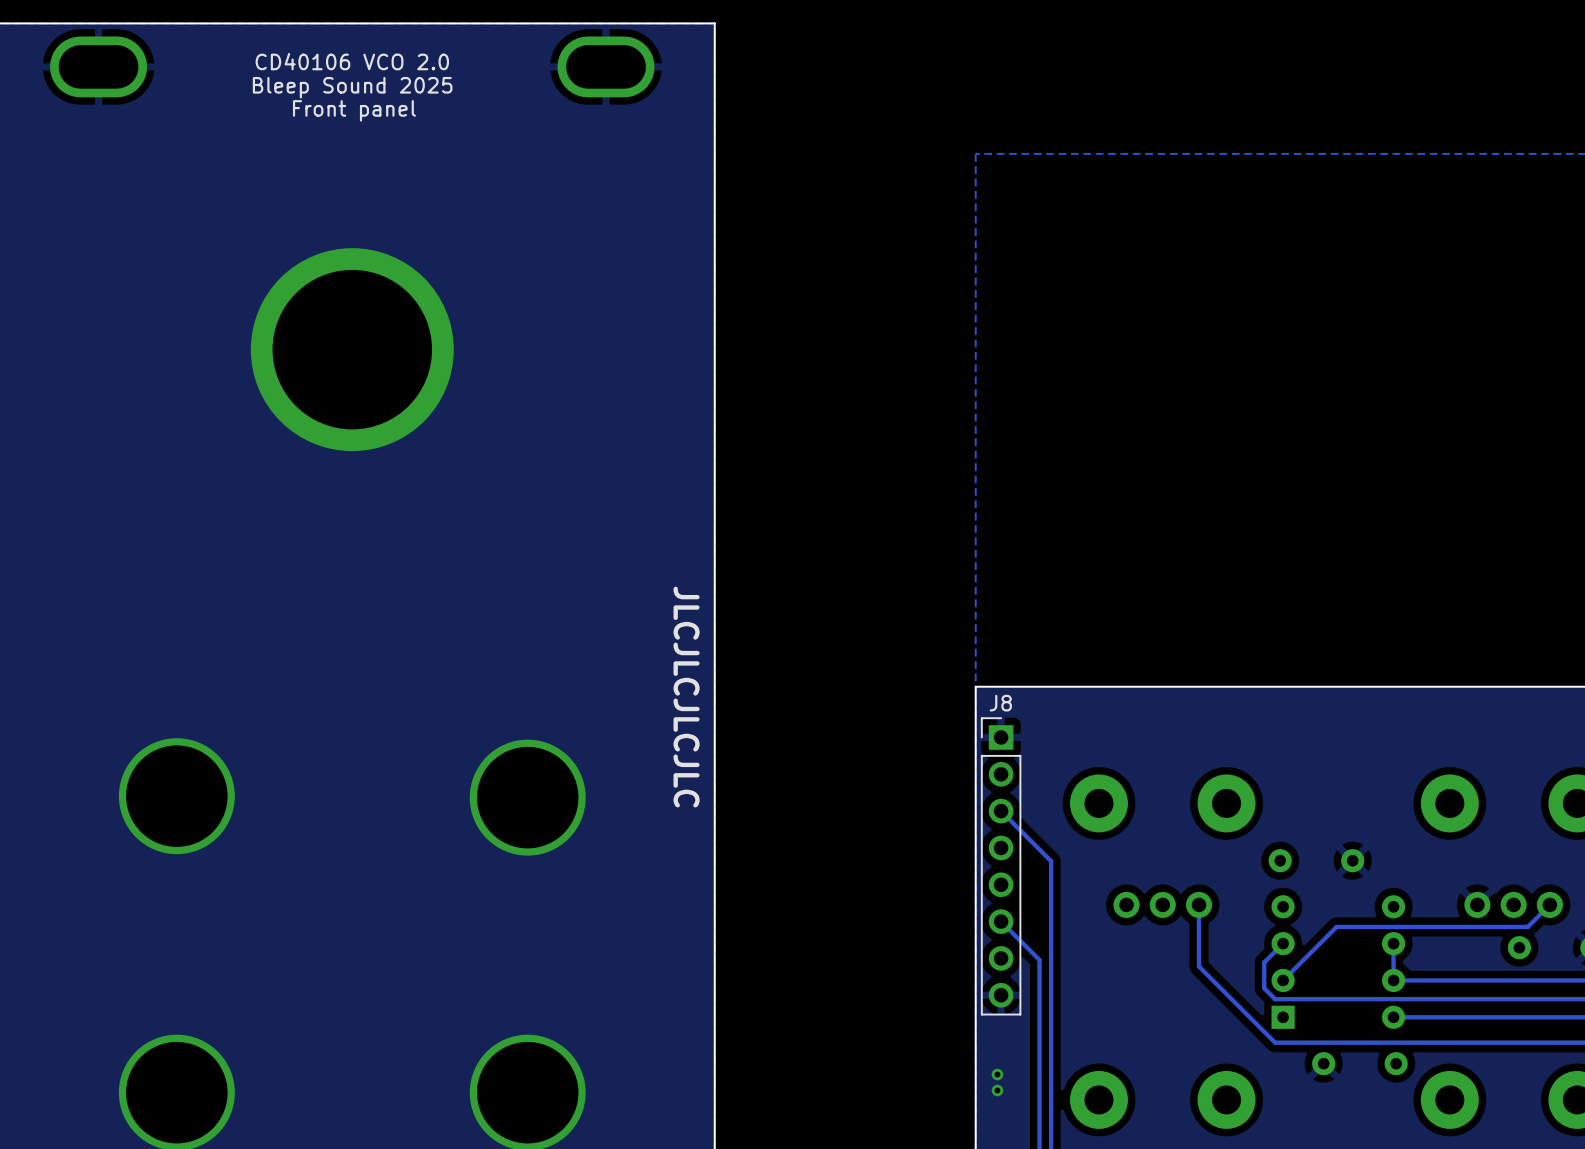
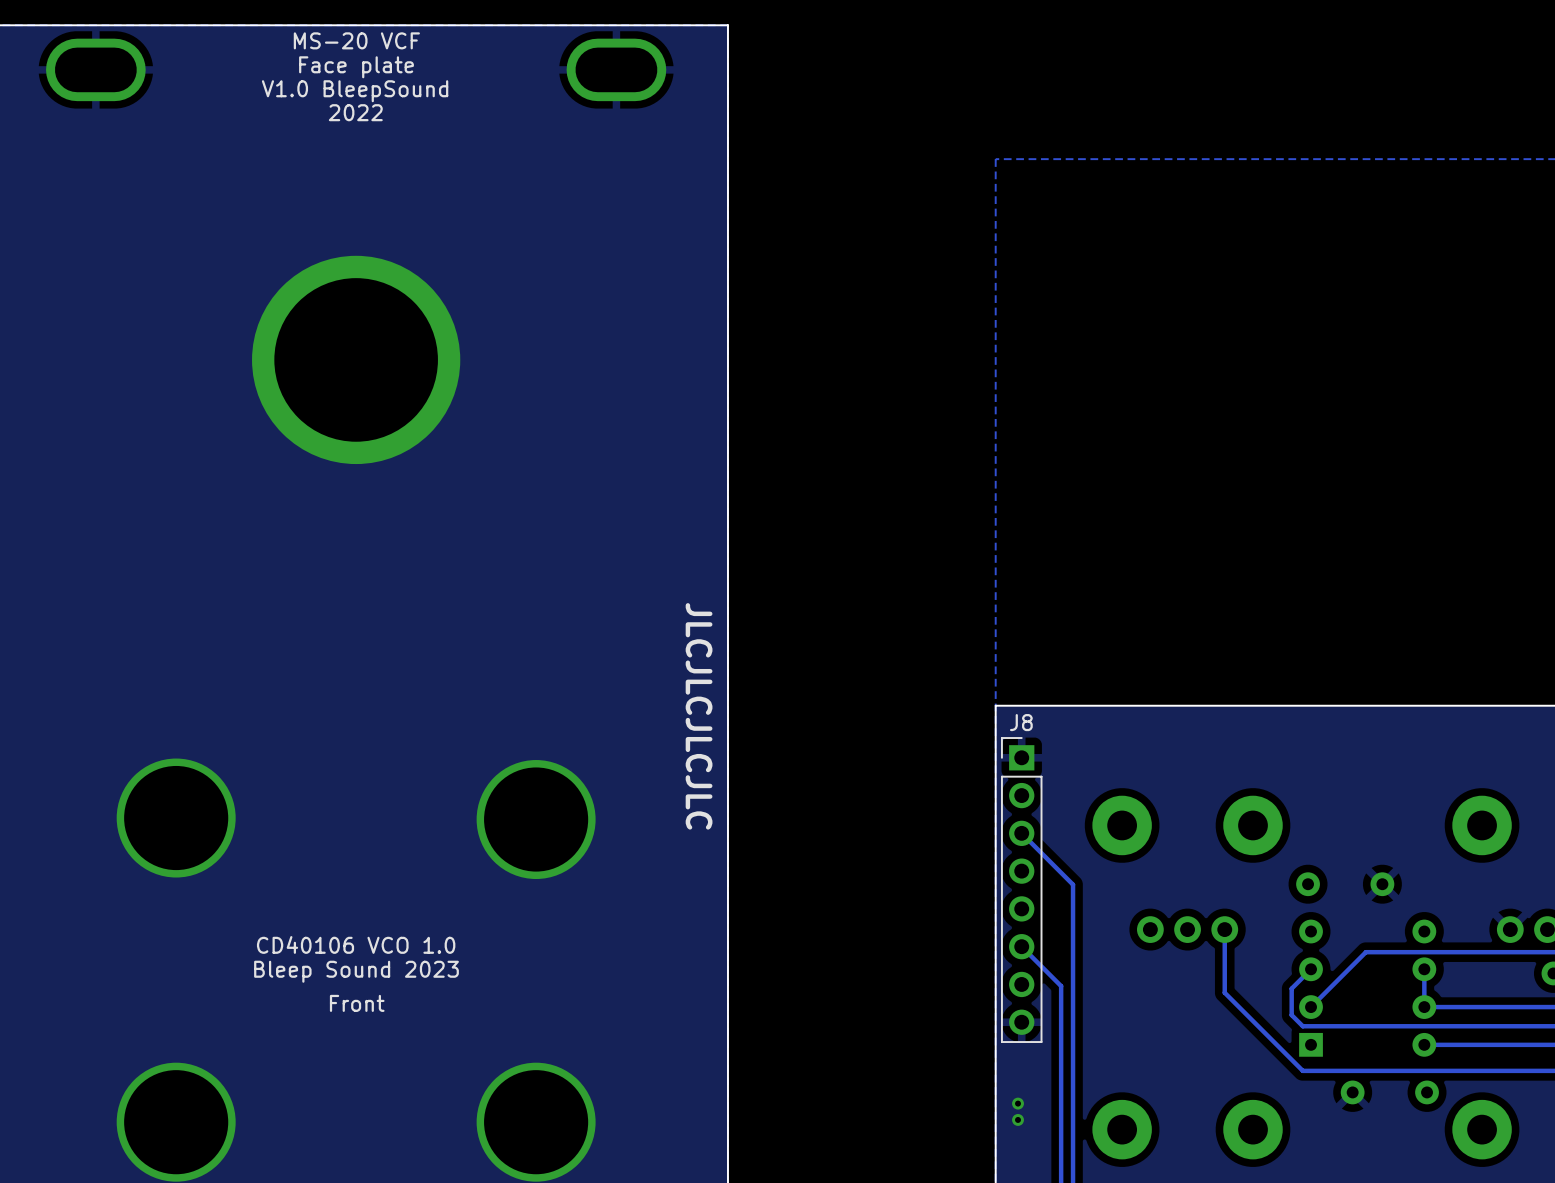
text: none -> MS-20 VCF (356, 40)
text: CD40106 VCO 2.0 (352, 61) -> Face plate (356, 67)
text: Bleep Sound 2025 (352, 87) -> V1.0 BleepSound (355, 91)
text: Front panel (354, 110) -> 2022 (355, 112)
text: none -> CD40106 VCO 1.0 (356, 944)
text: none -> Bleep Sound 2023 (356, 971)
text: none -> Front (357, 1003)

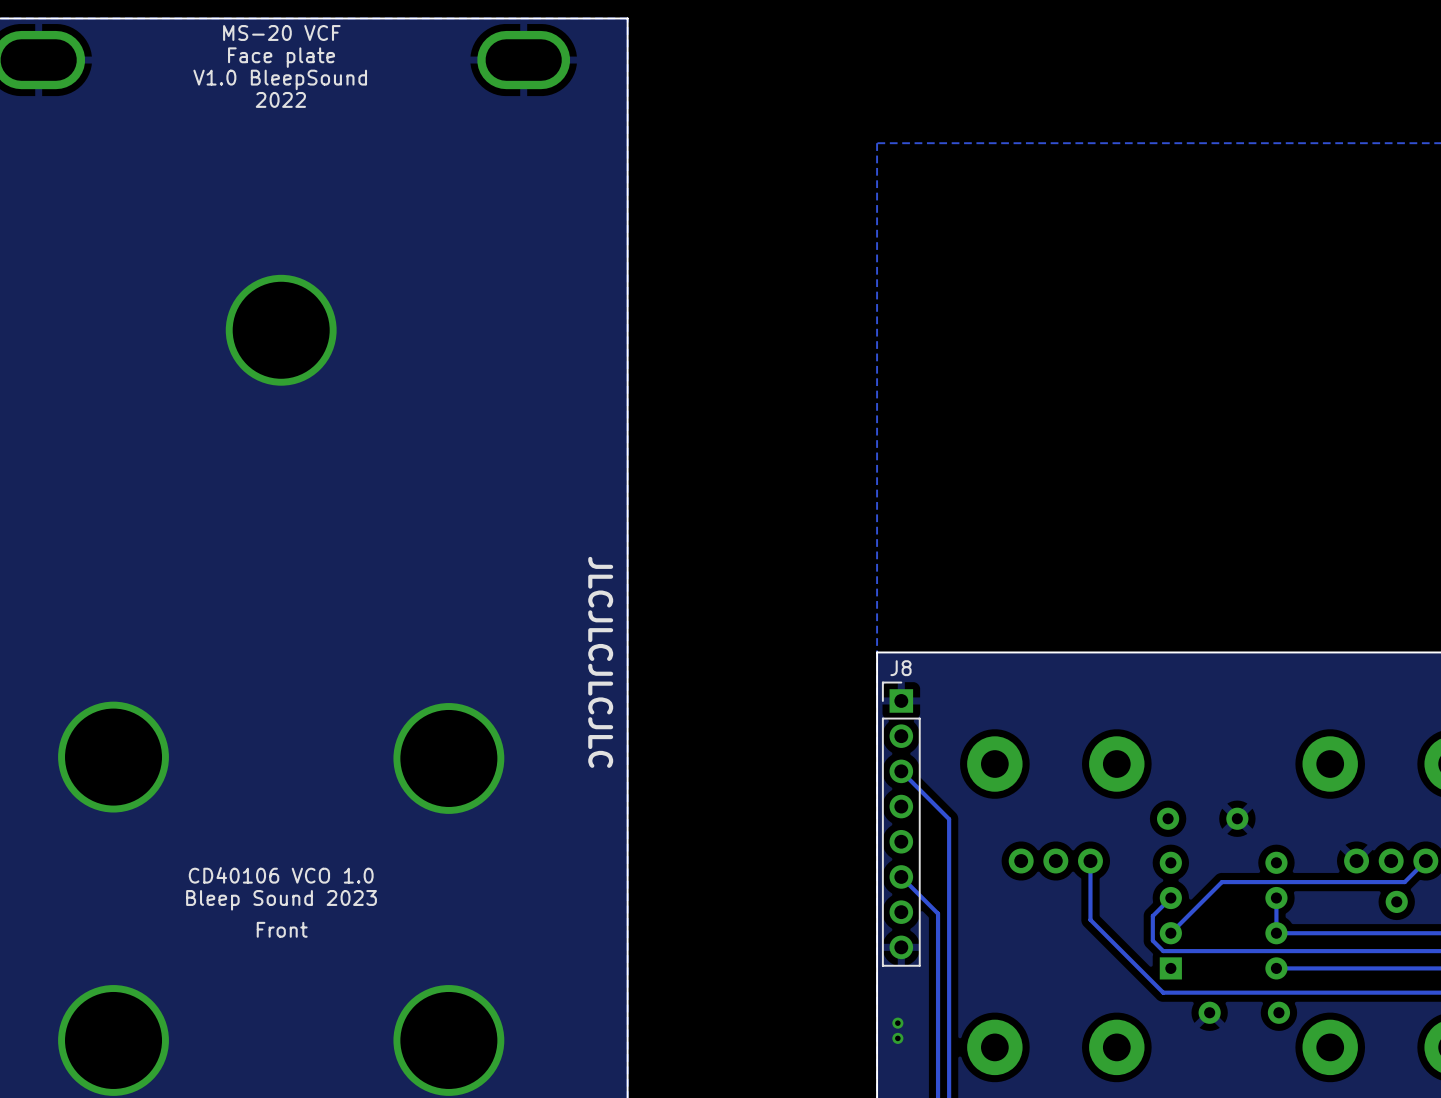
via size: [252, 255, 461, 465] -> [225, 274, 337, 386]

